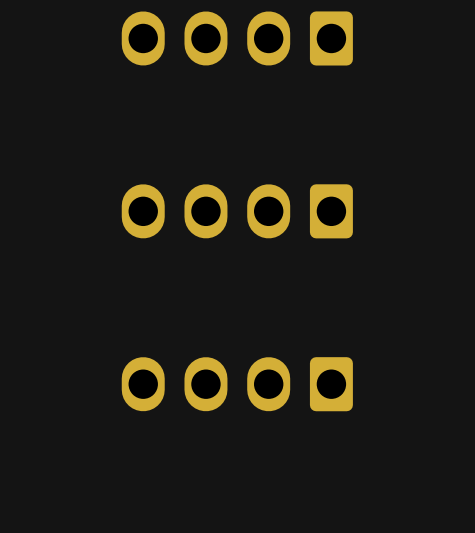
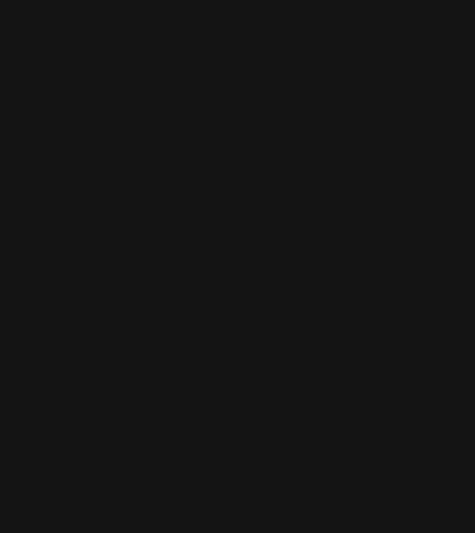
part: (237, 38) -> none
part: (237, 211) -> none
part: (237, 384) -> none

